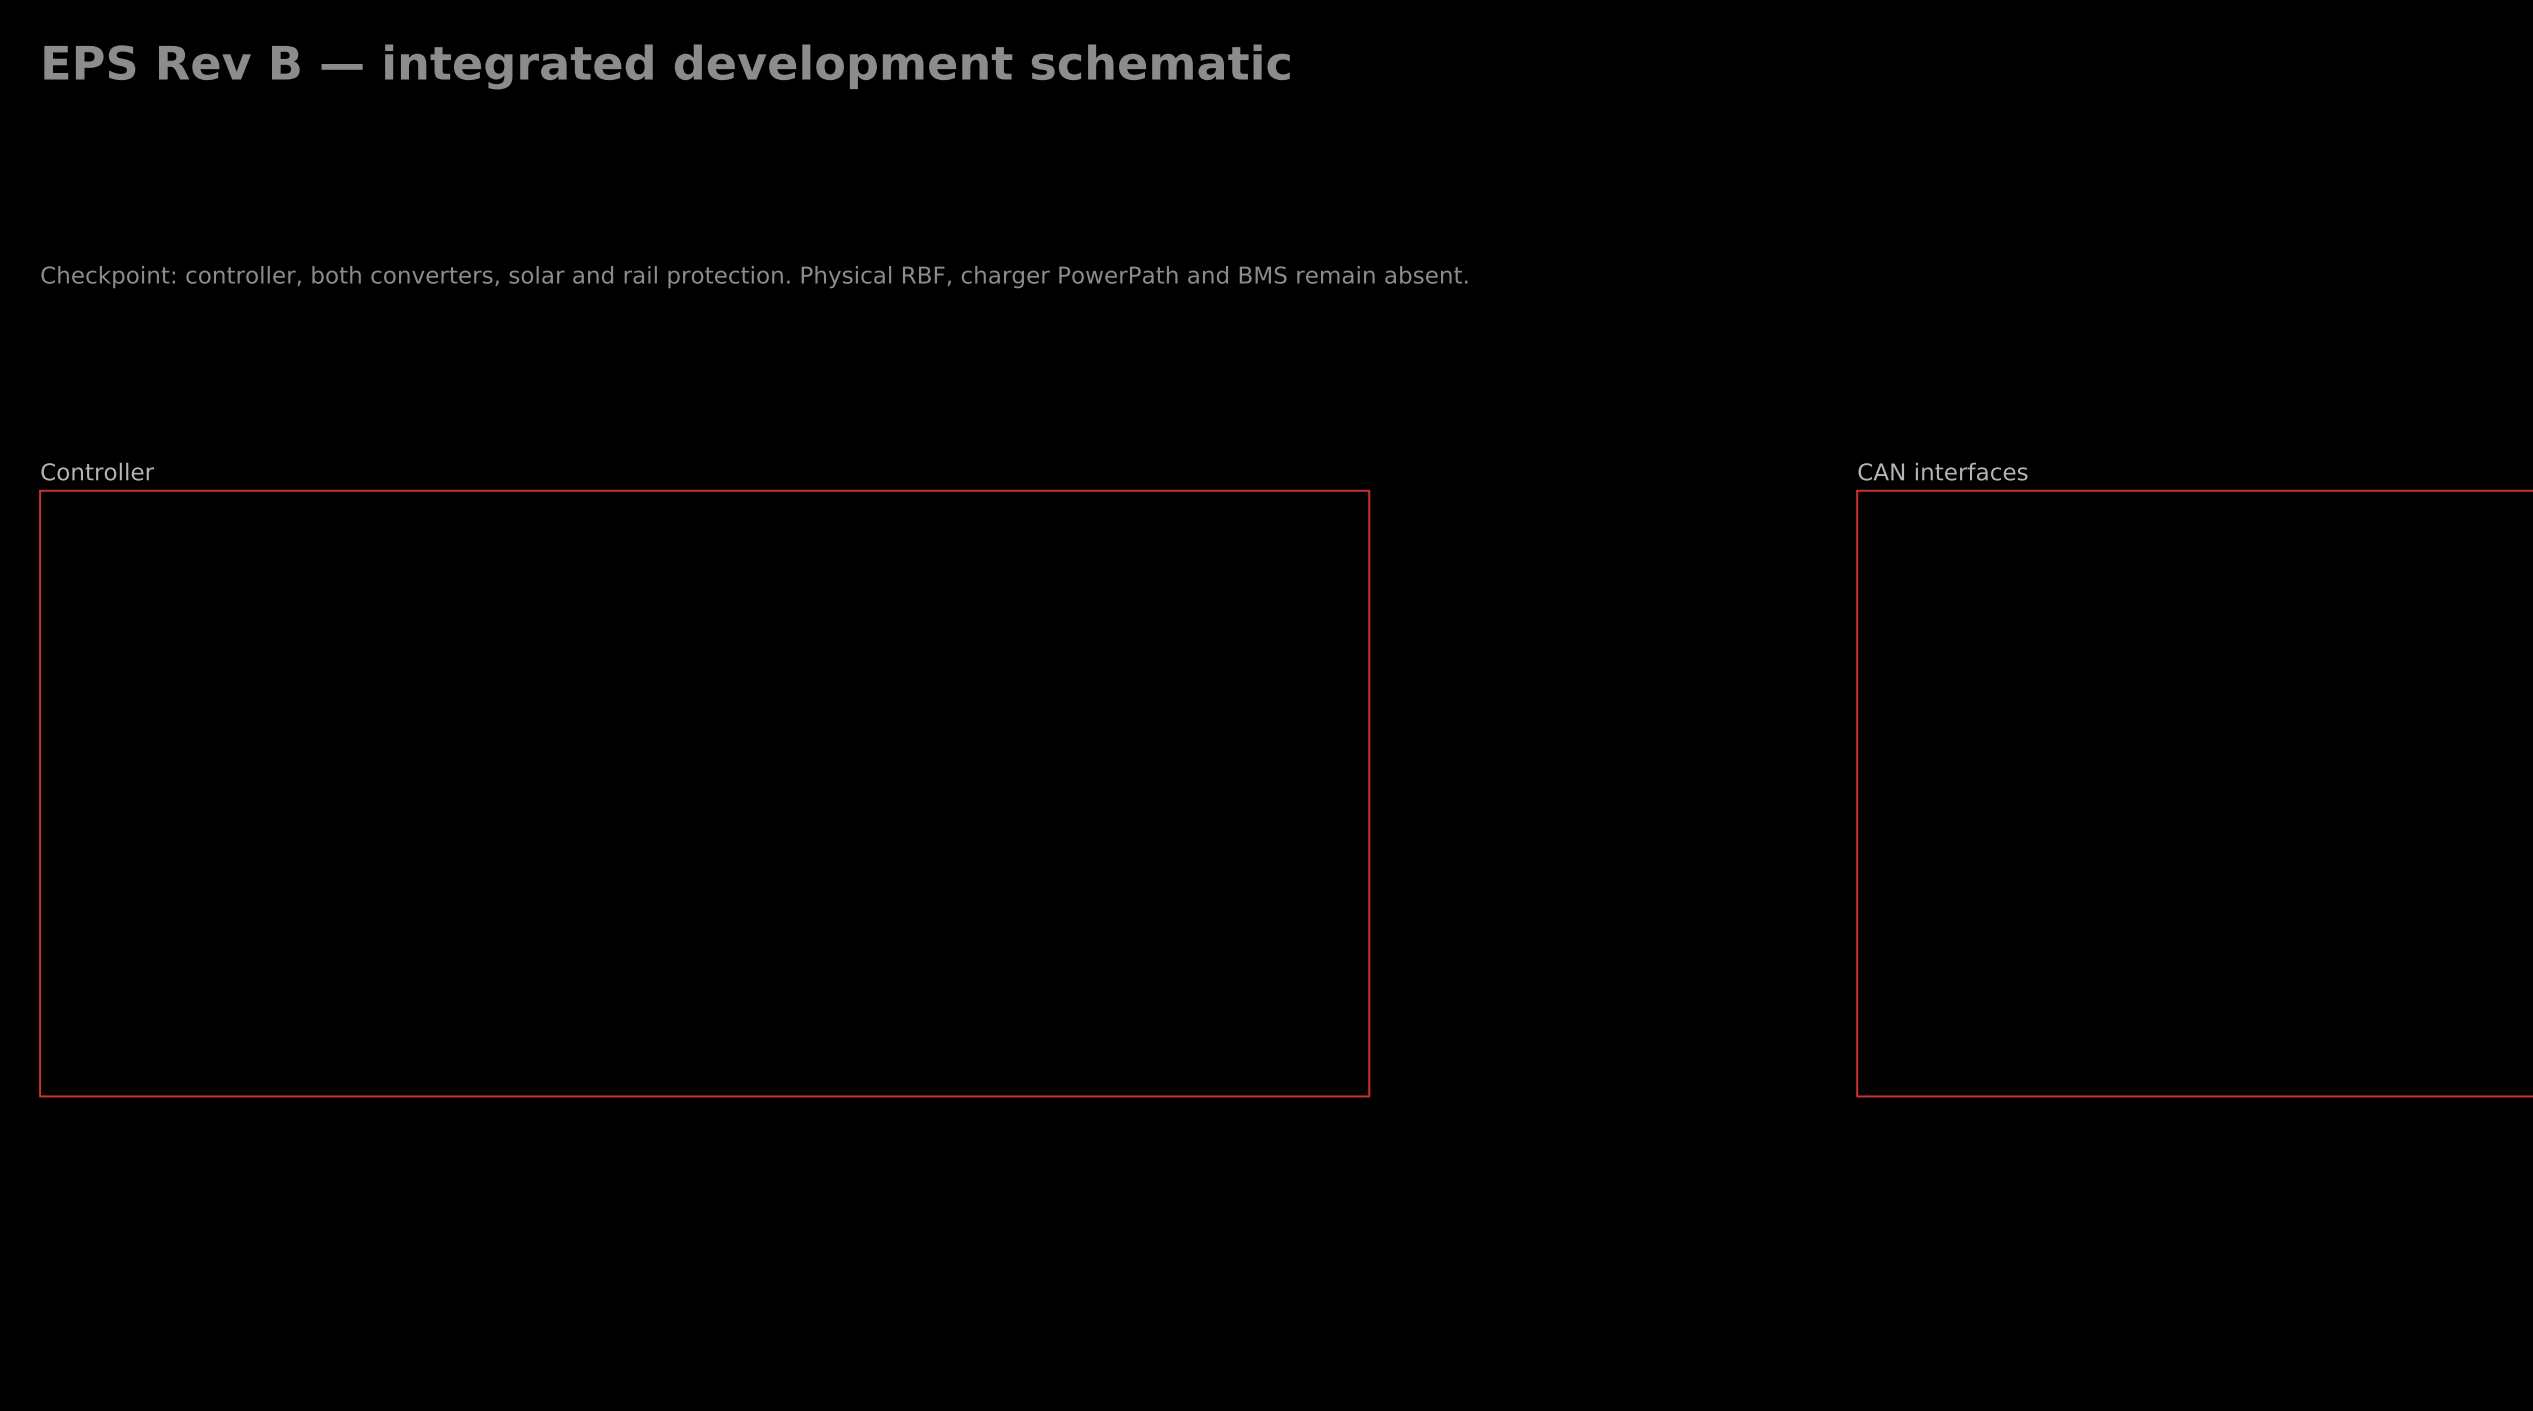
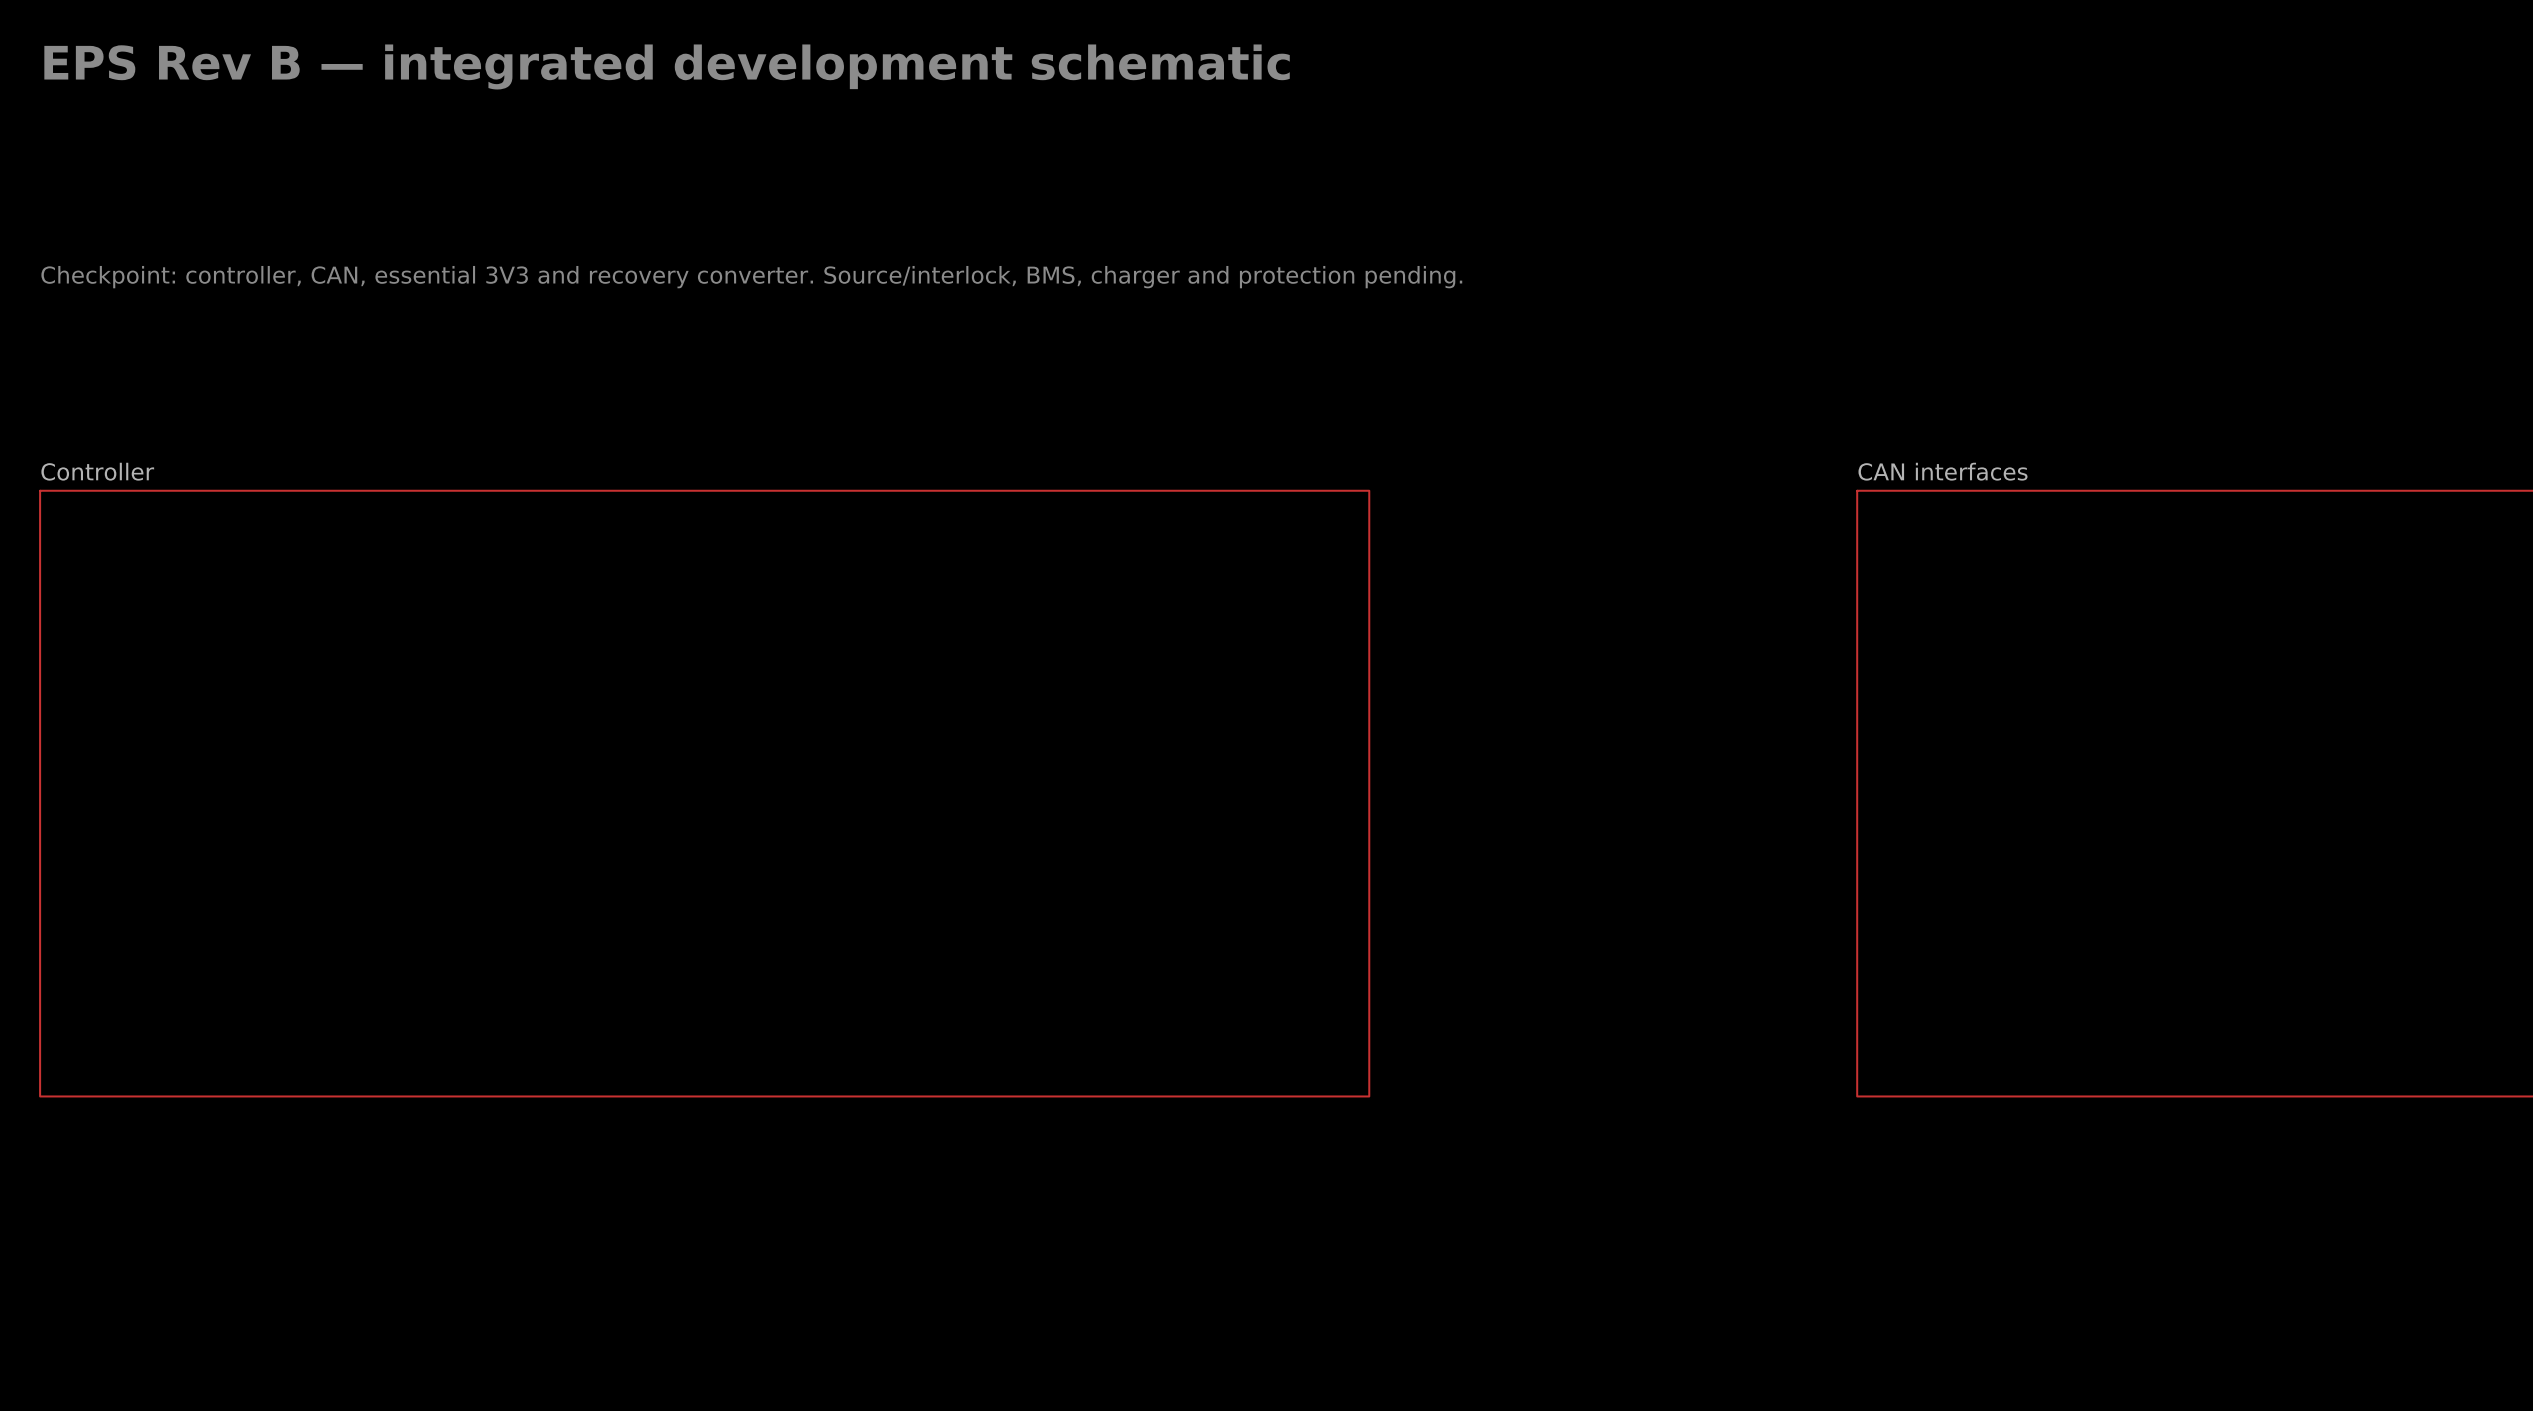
text: Checkpoint: controller, both converters, solar and rail protection. Physical RBF, charger PowerPath and BMS remain absent. (754, 277) -> Checkpoint: controller, CAN, essential 3V3 and recovery converter. Source/interlock, BMS, charger and protection pending. (751, 277)

